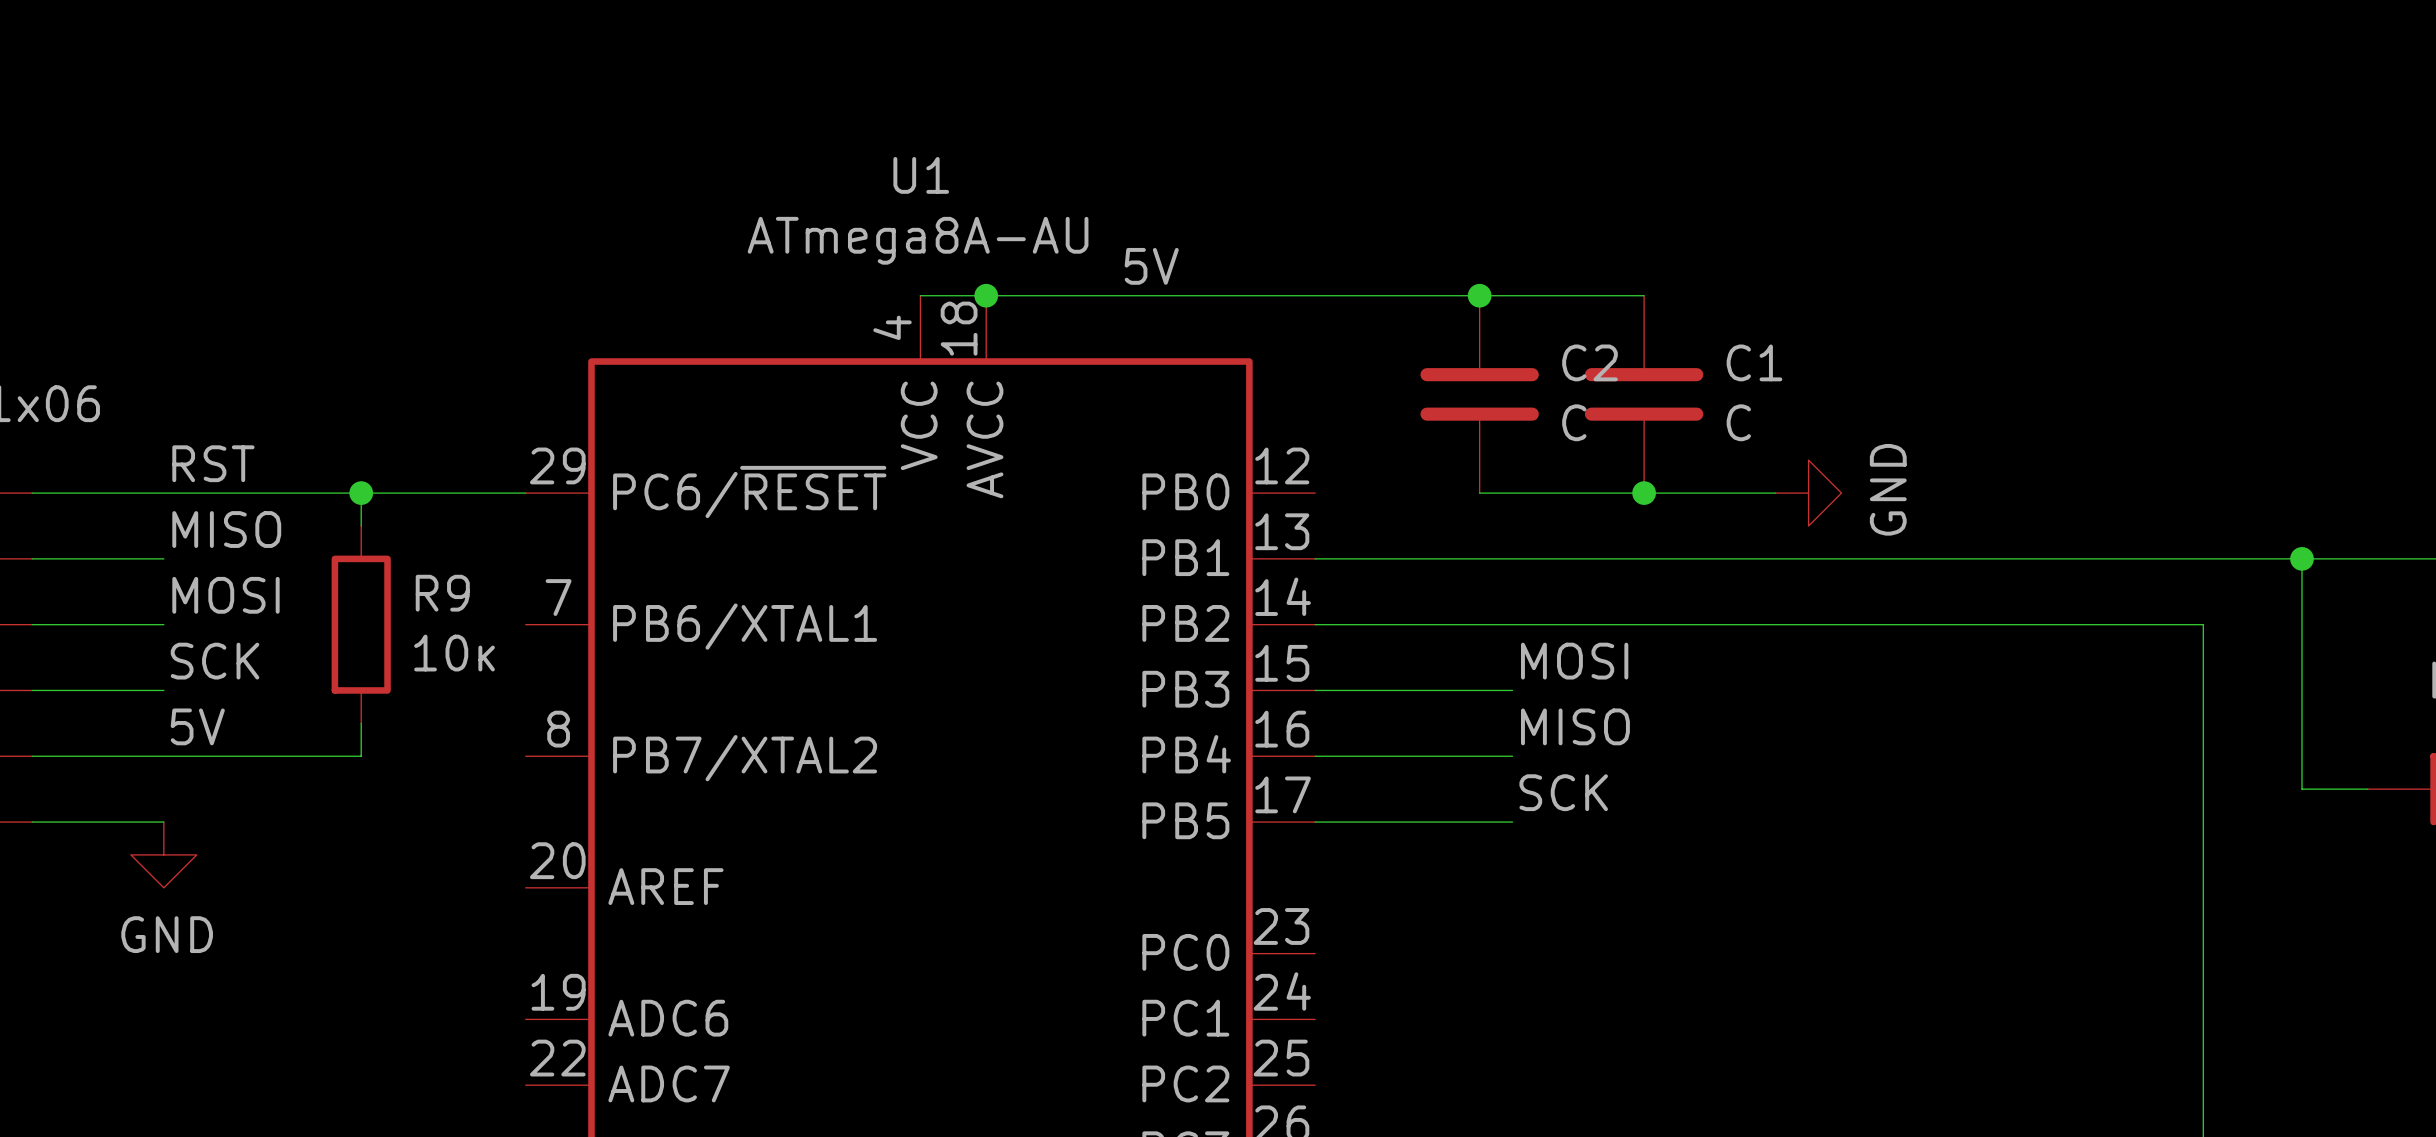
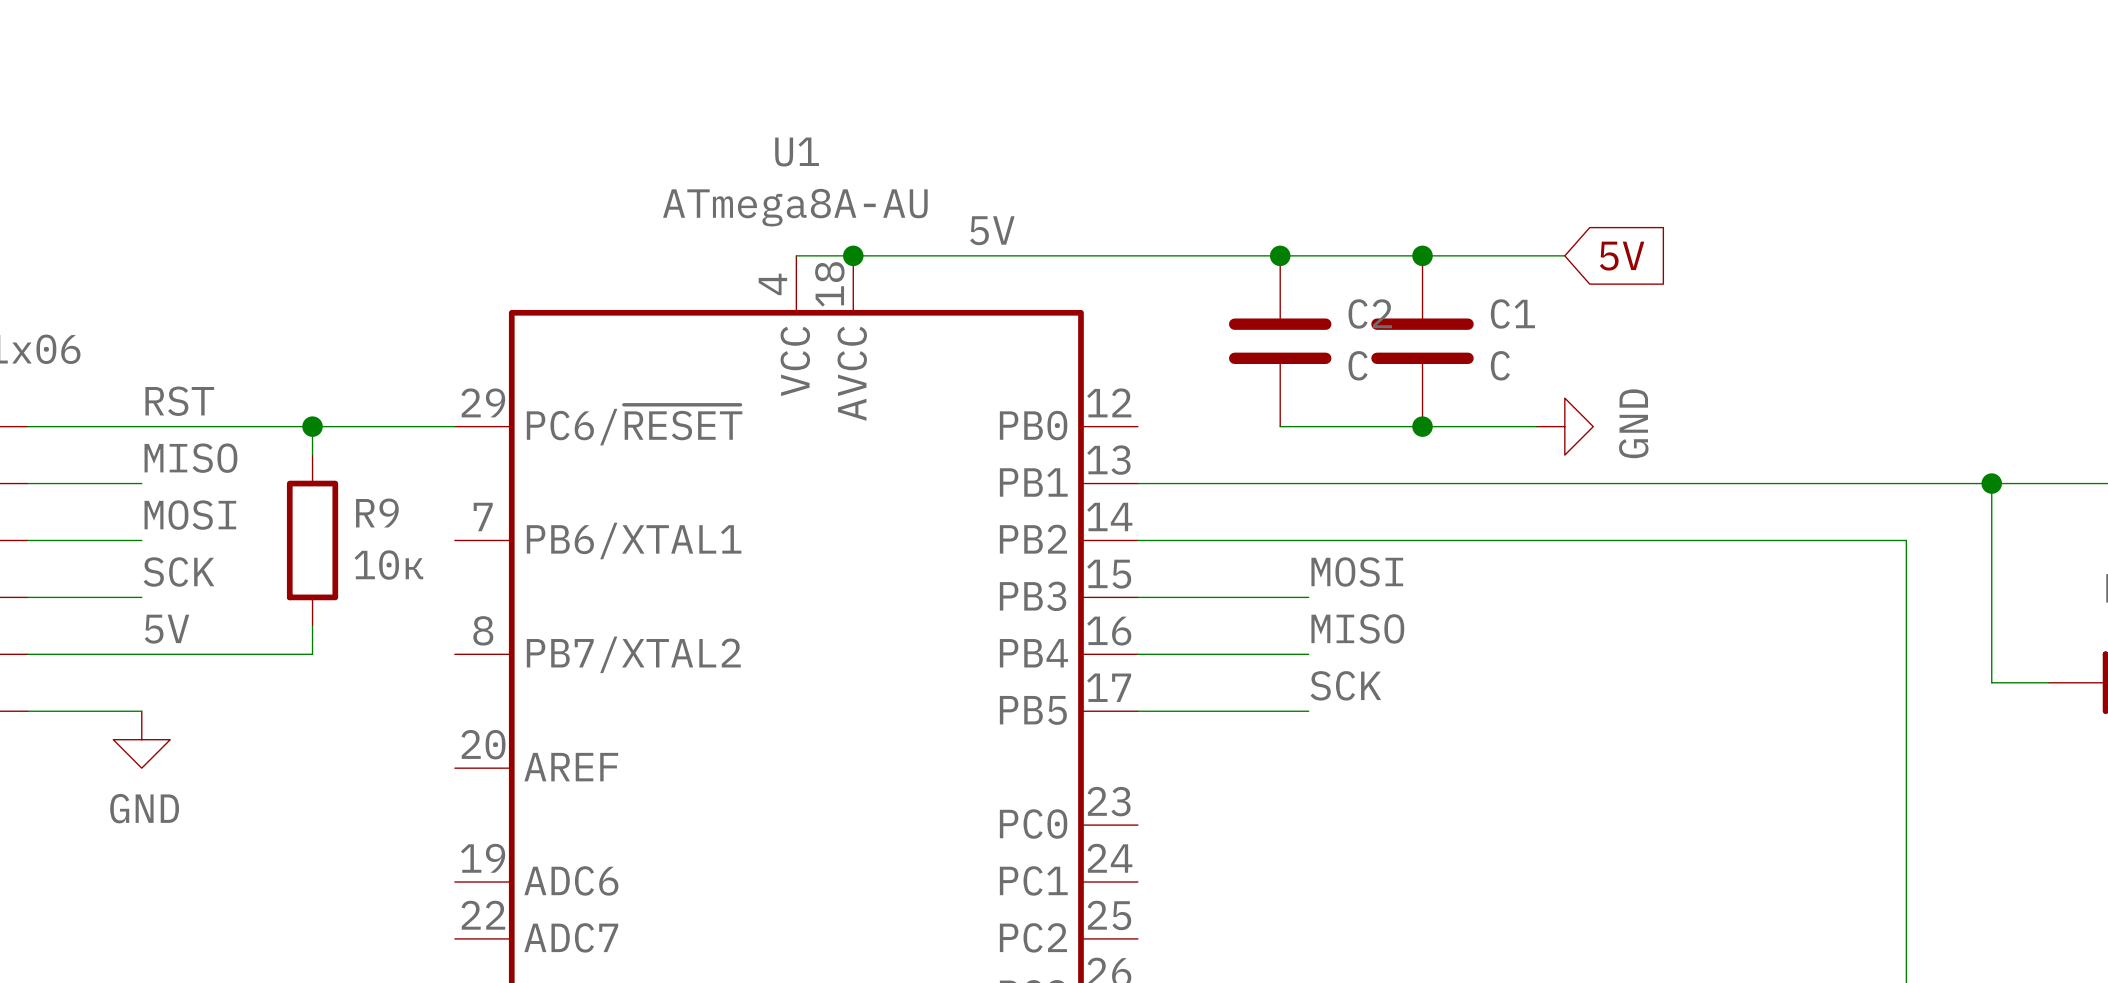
wire: none -> (1422, 255) (1564, 255)
junction: none -> (1422, 255)
global label: none -> 5V (1622, 256)

